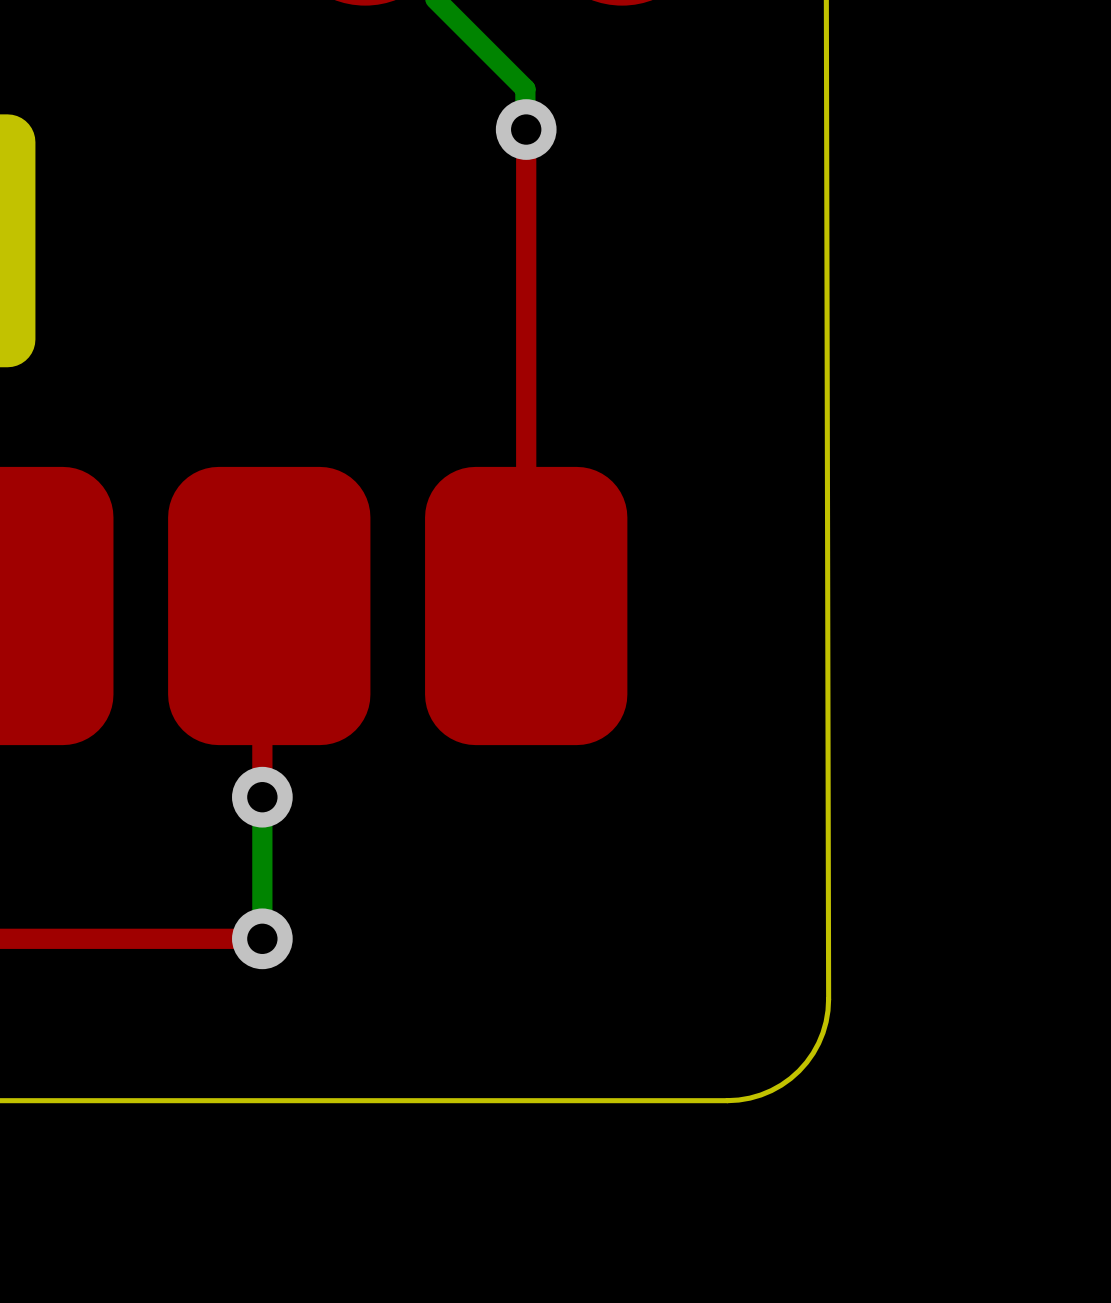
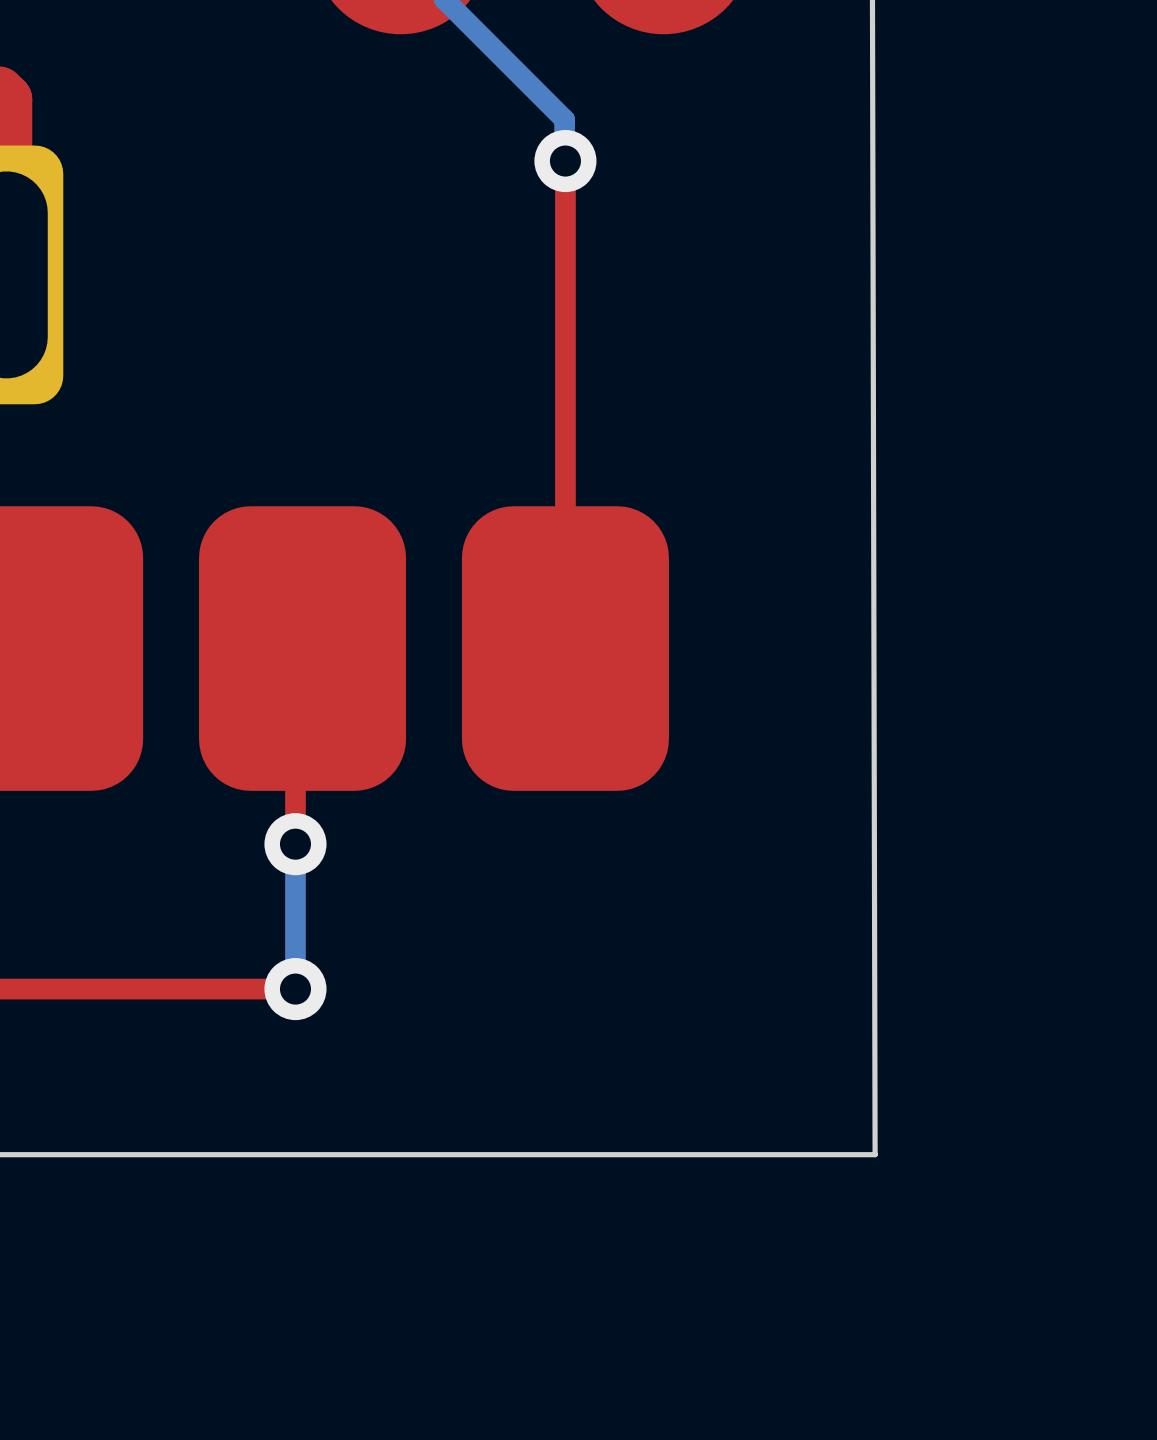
board edge: (828, 999) (823, 1032) (813, 1053) (799, 1070) (771, 1090) (750, 1098) (727, 1100) -> (874, 1050) (875, 1154) (771, 1154)

